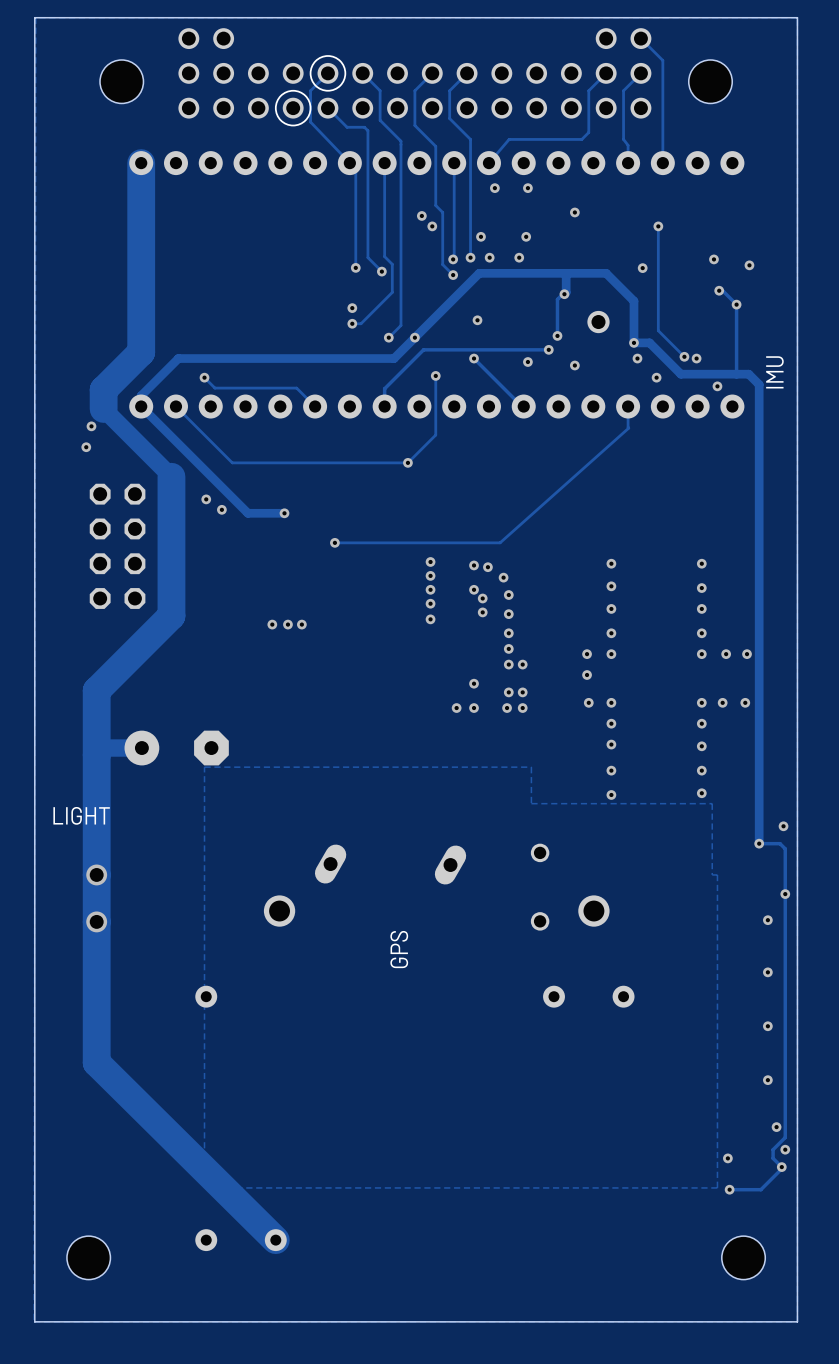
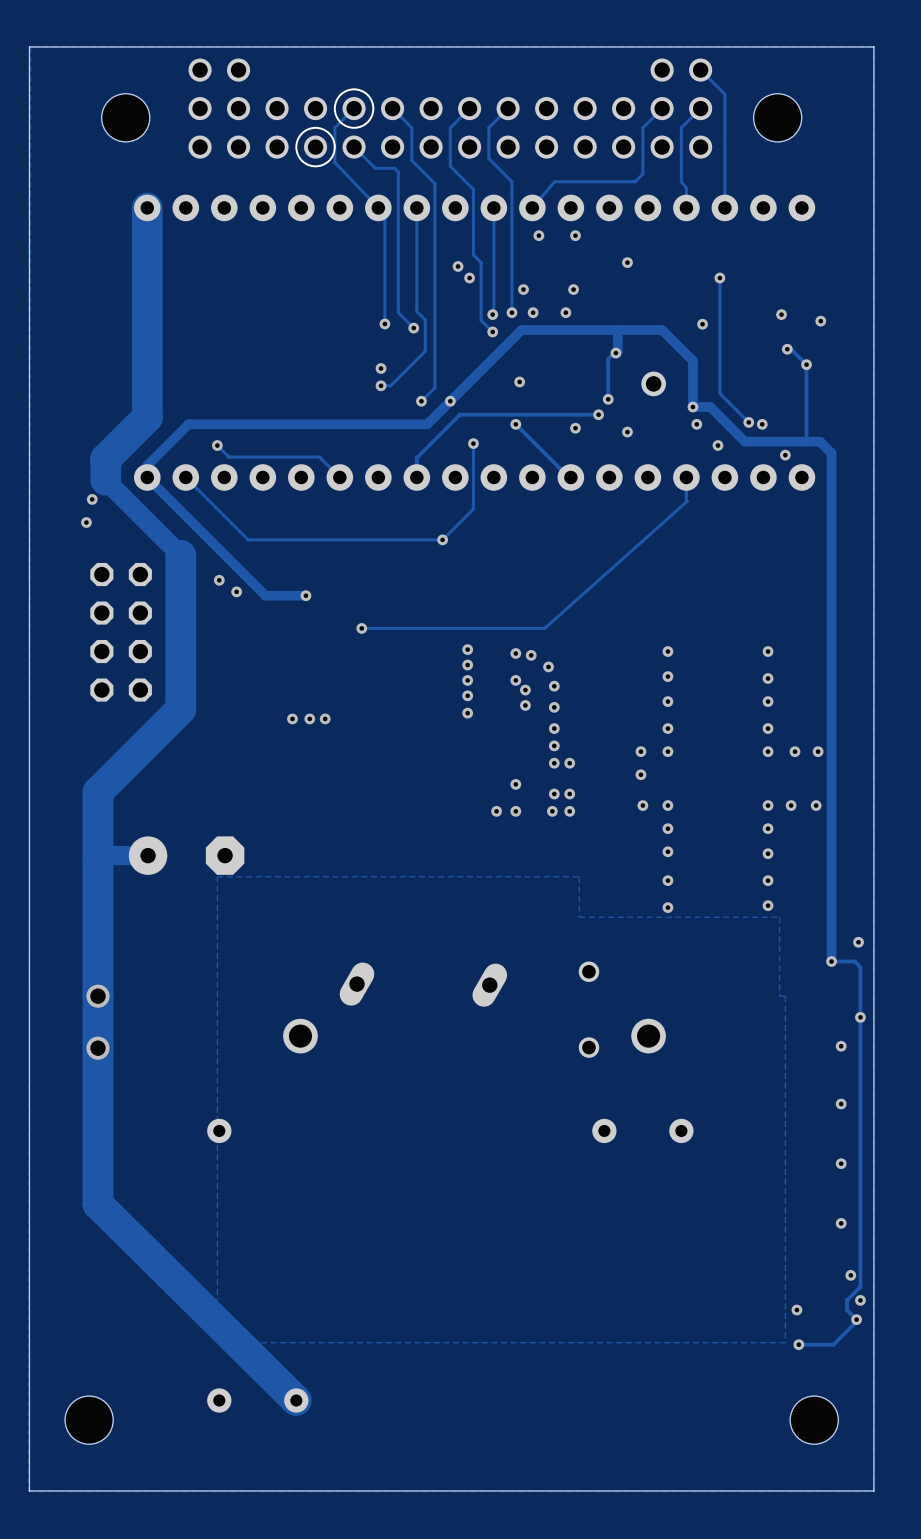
text: IMU (774, 372) -> none
text: LIGHT (81, 815) -> none
text: GPS (399, 949) -> none

